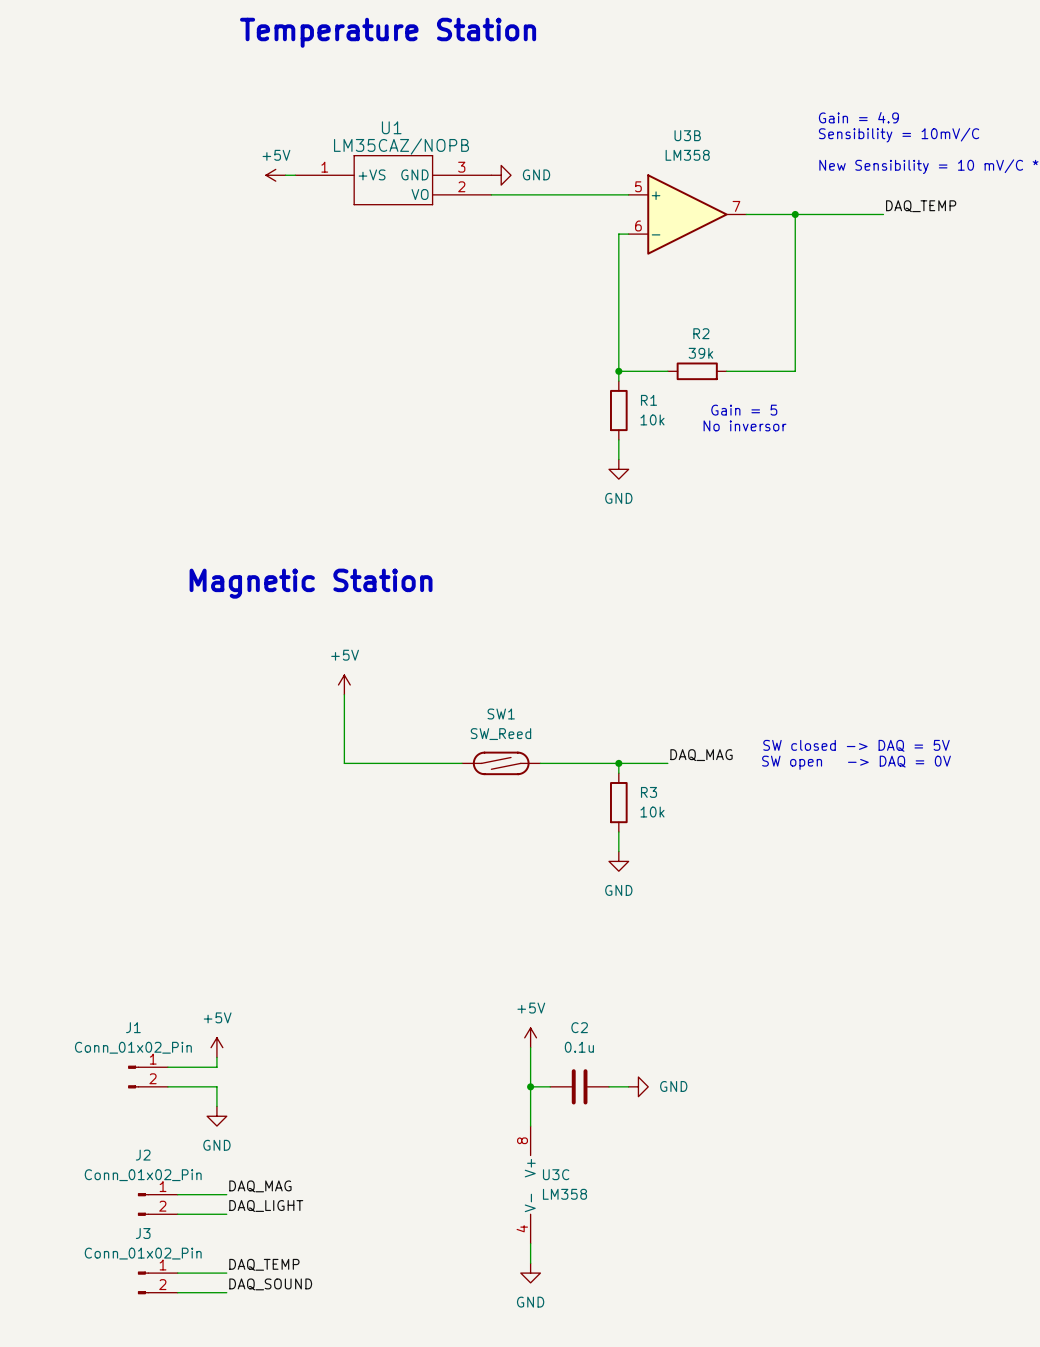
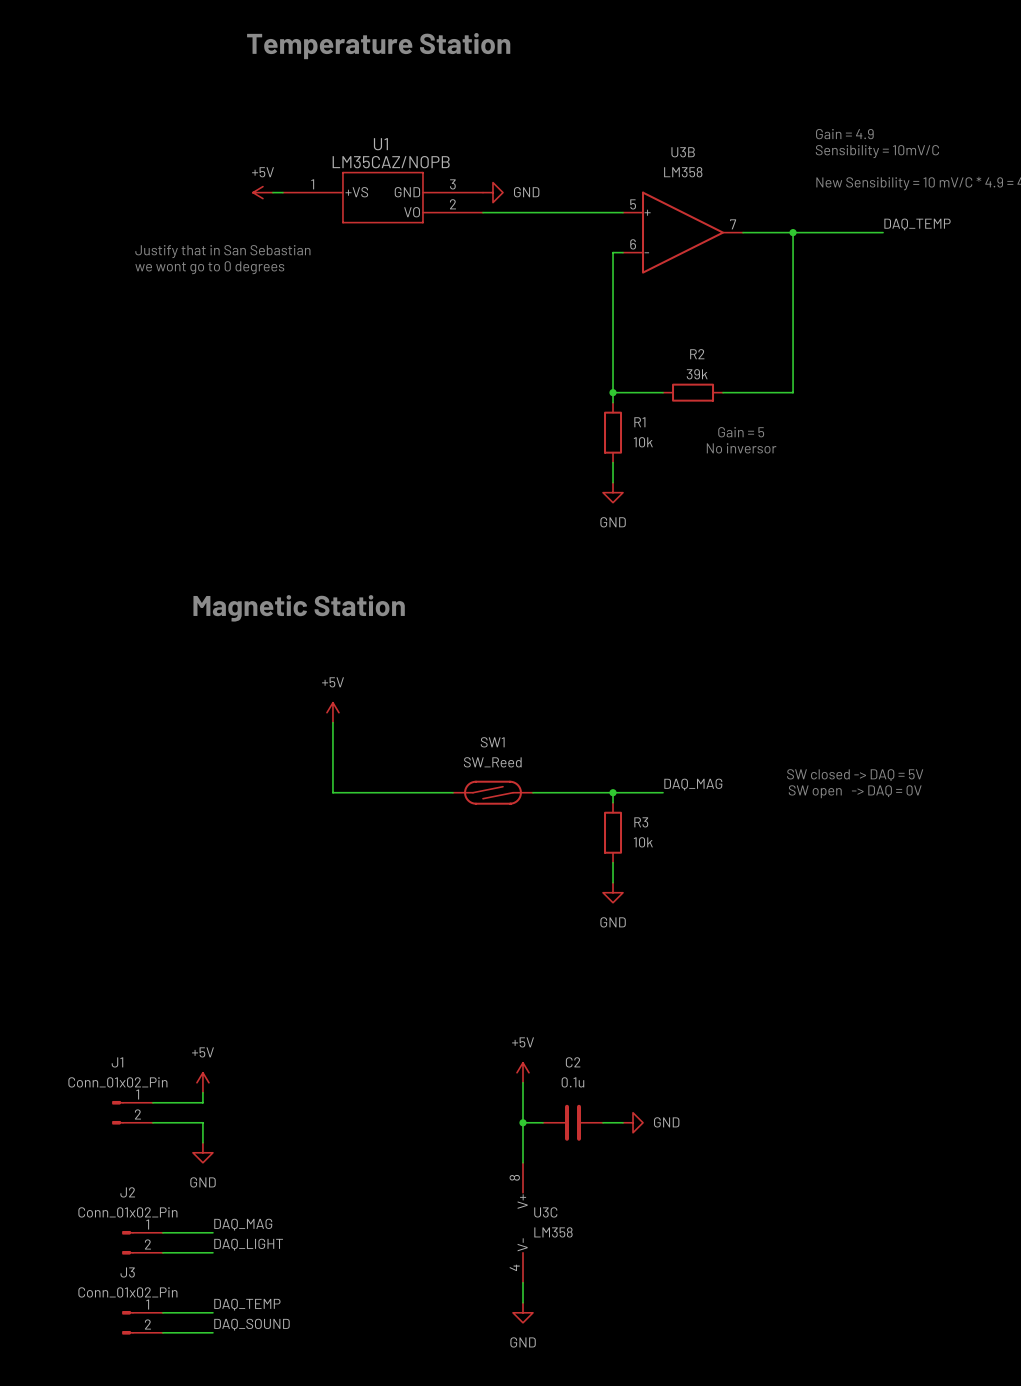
text: none -> Justify that in San Sebastian (222, 251)
text: none -> we wont go to 0 degrees (209, 267)

